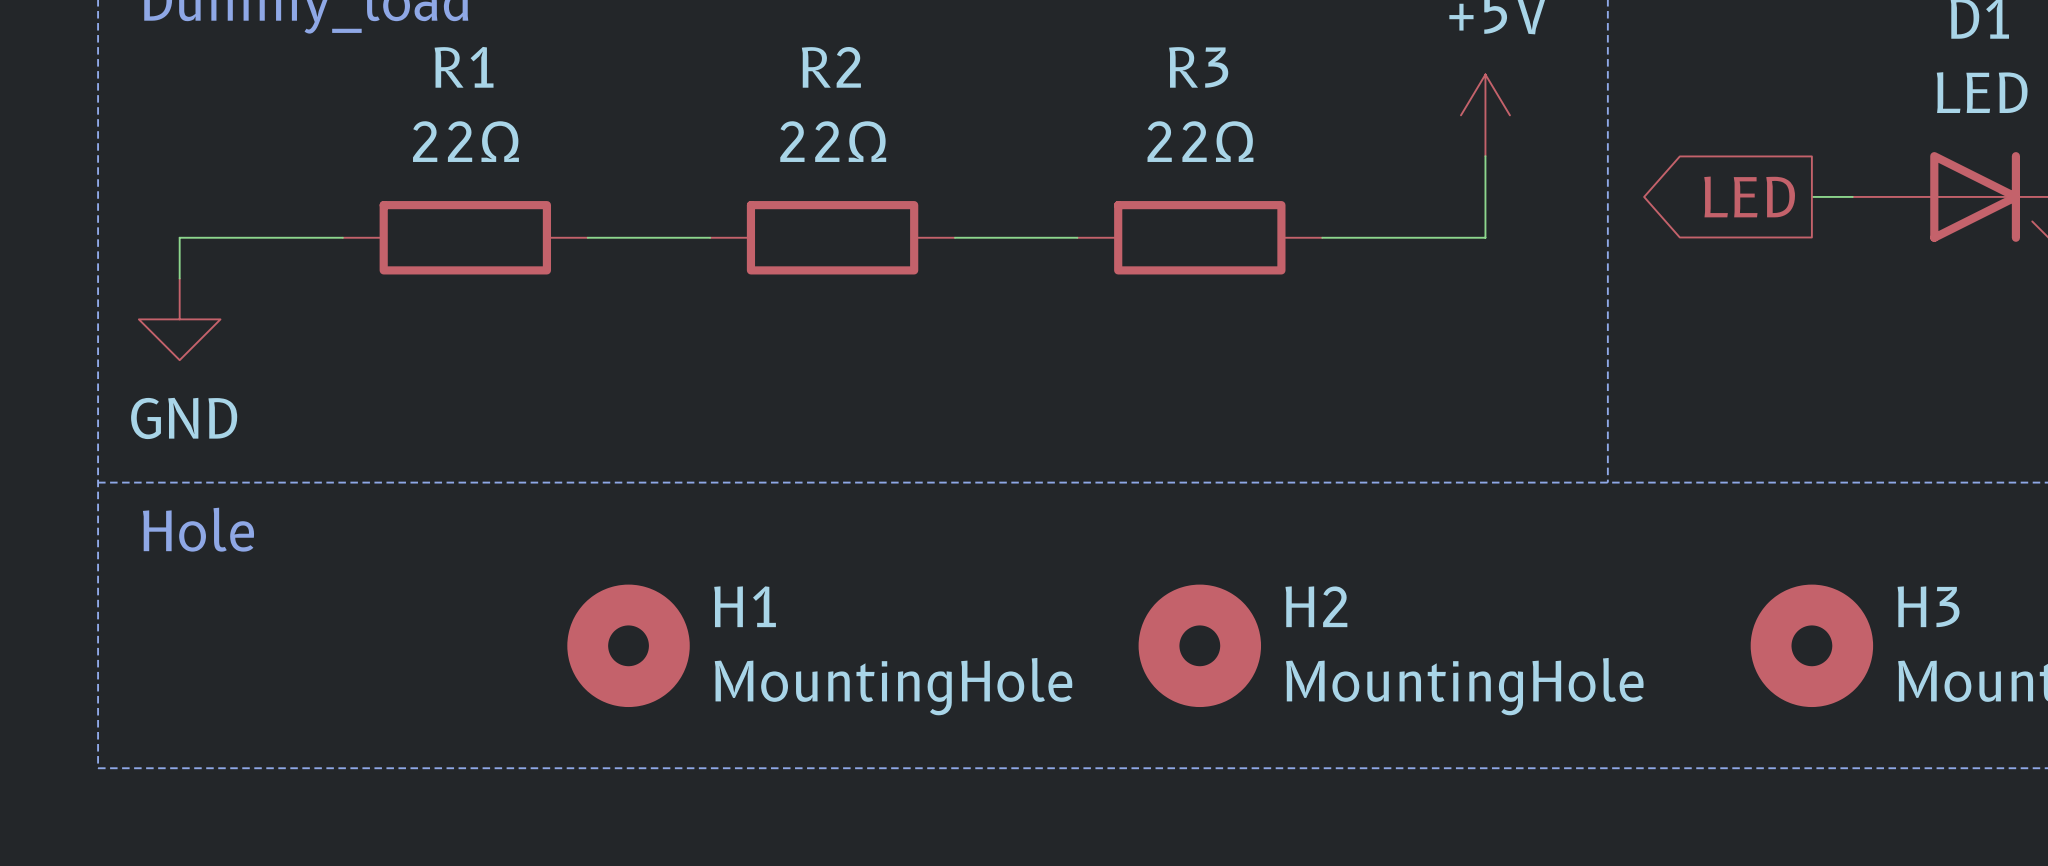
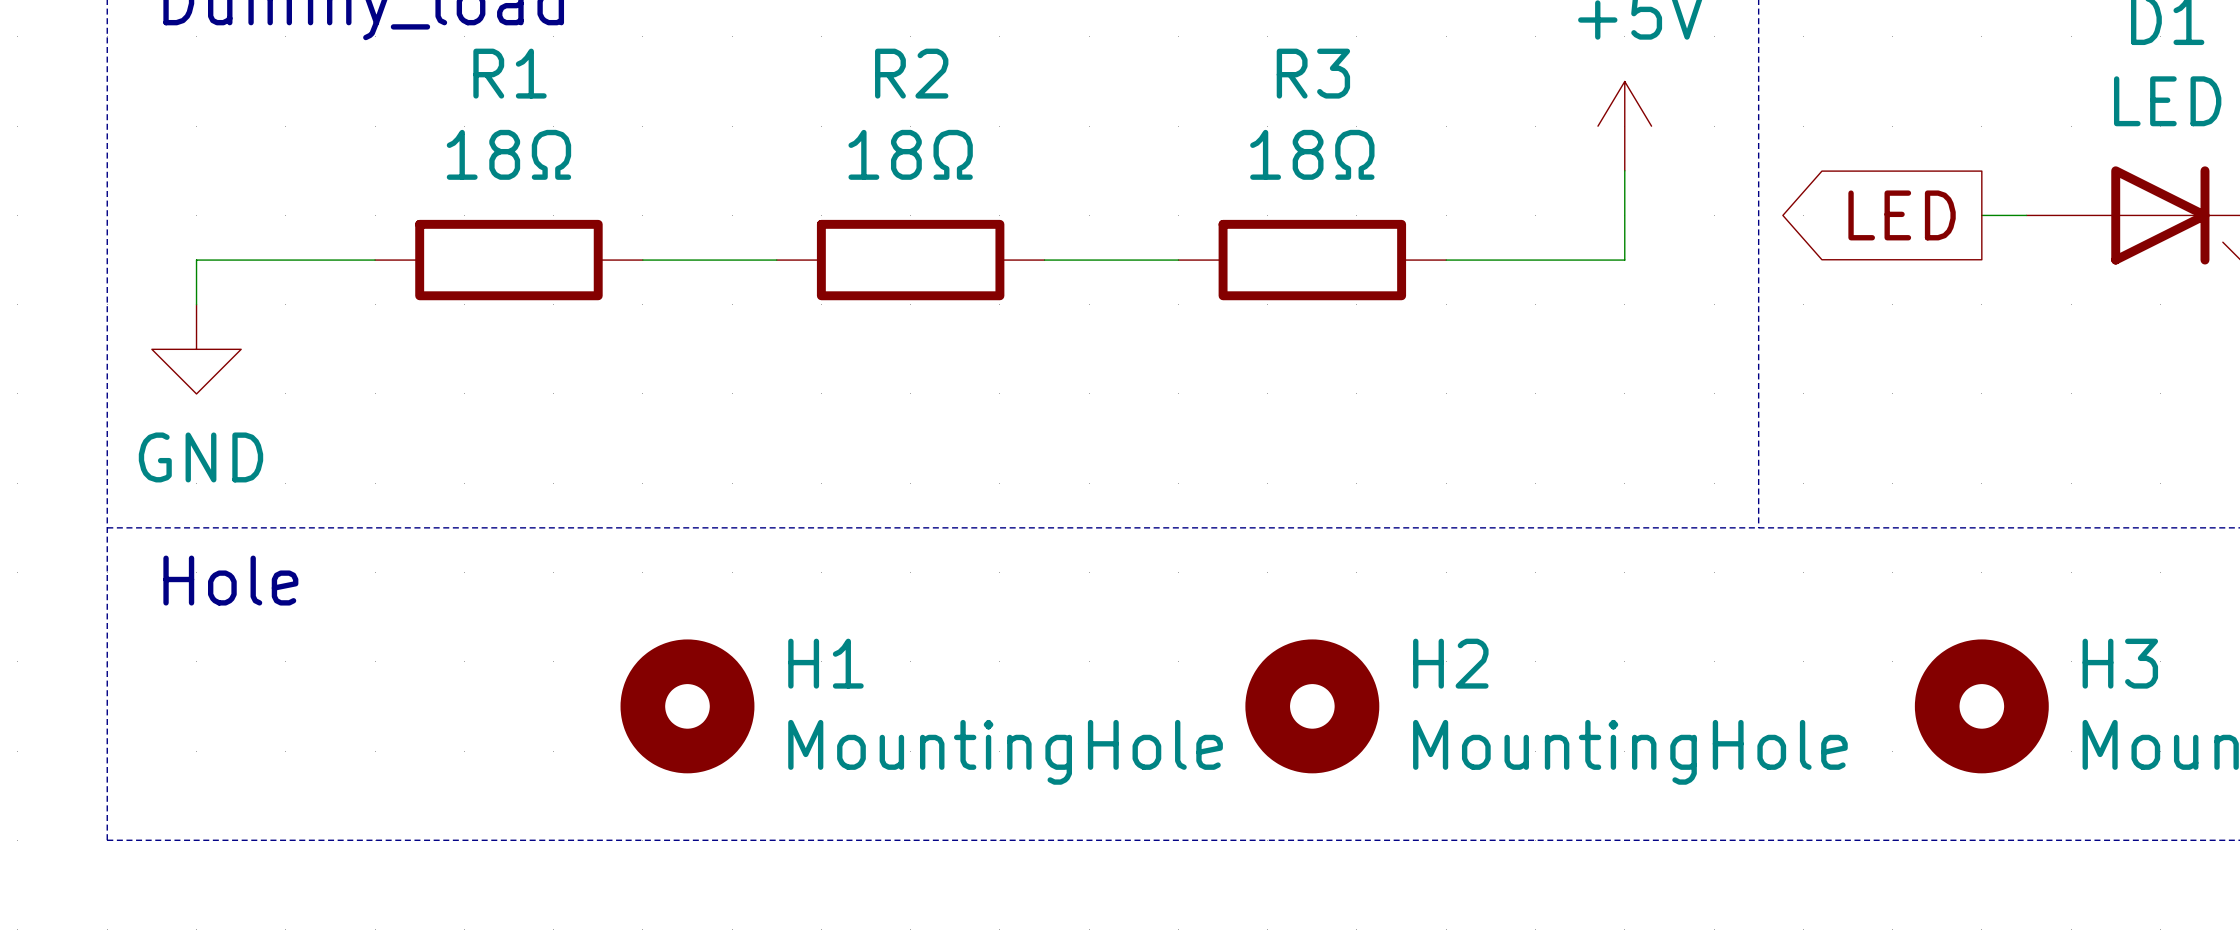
R1 value: 22Ω (465, 141) -> 18Ω (508, 154)
R2 value: 22Ω (833, 141) -> 18Ω (910, 154)
R3 value: 22Ω (1200, 141) -> 18Ω (1312, 154)

